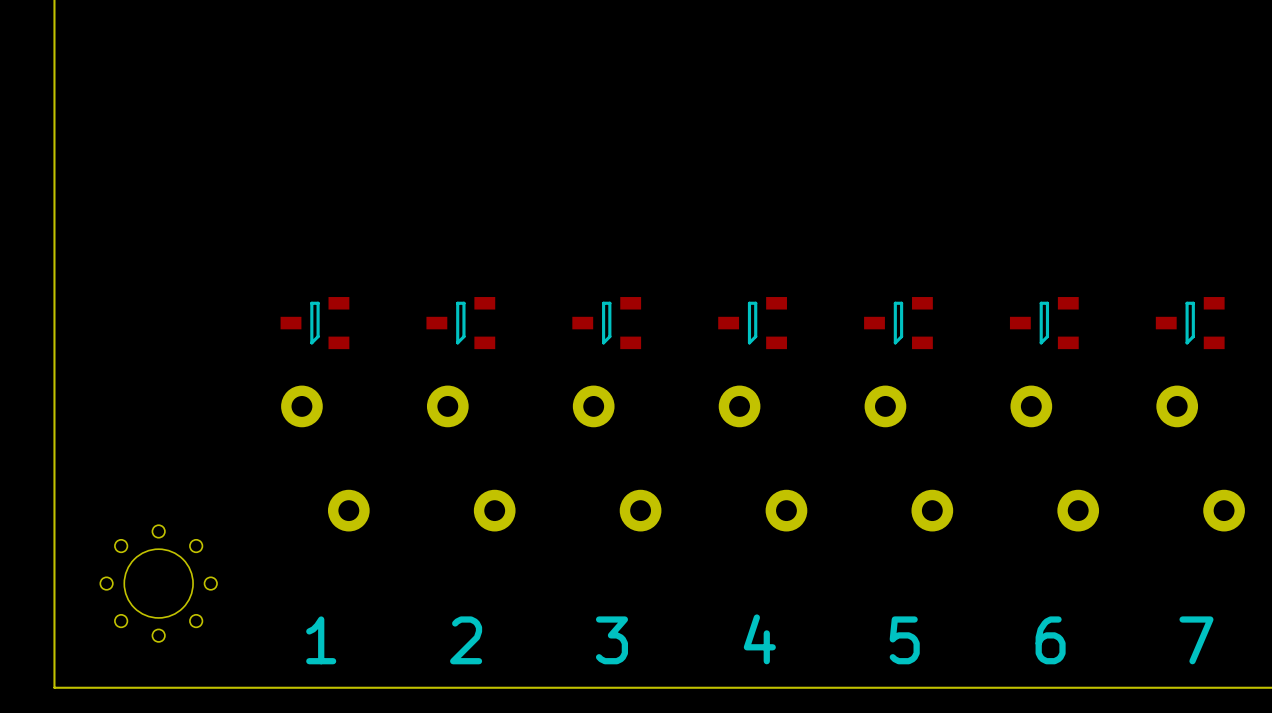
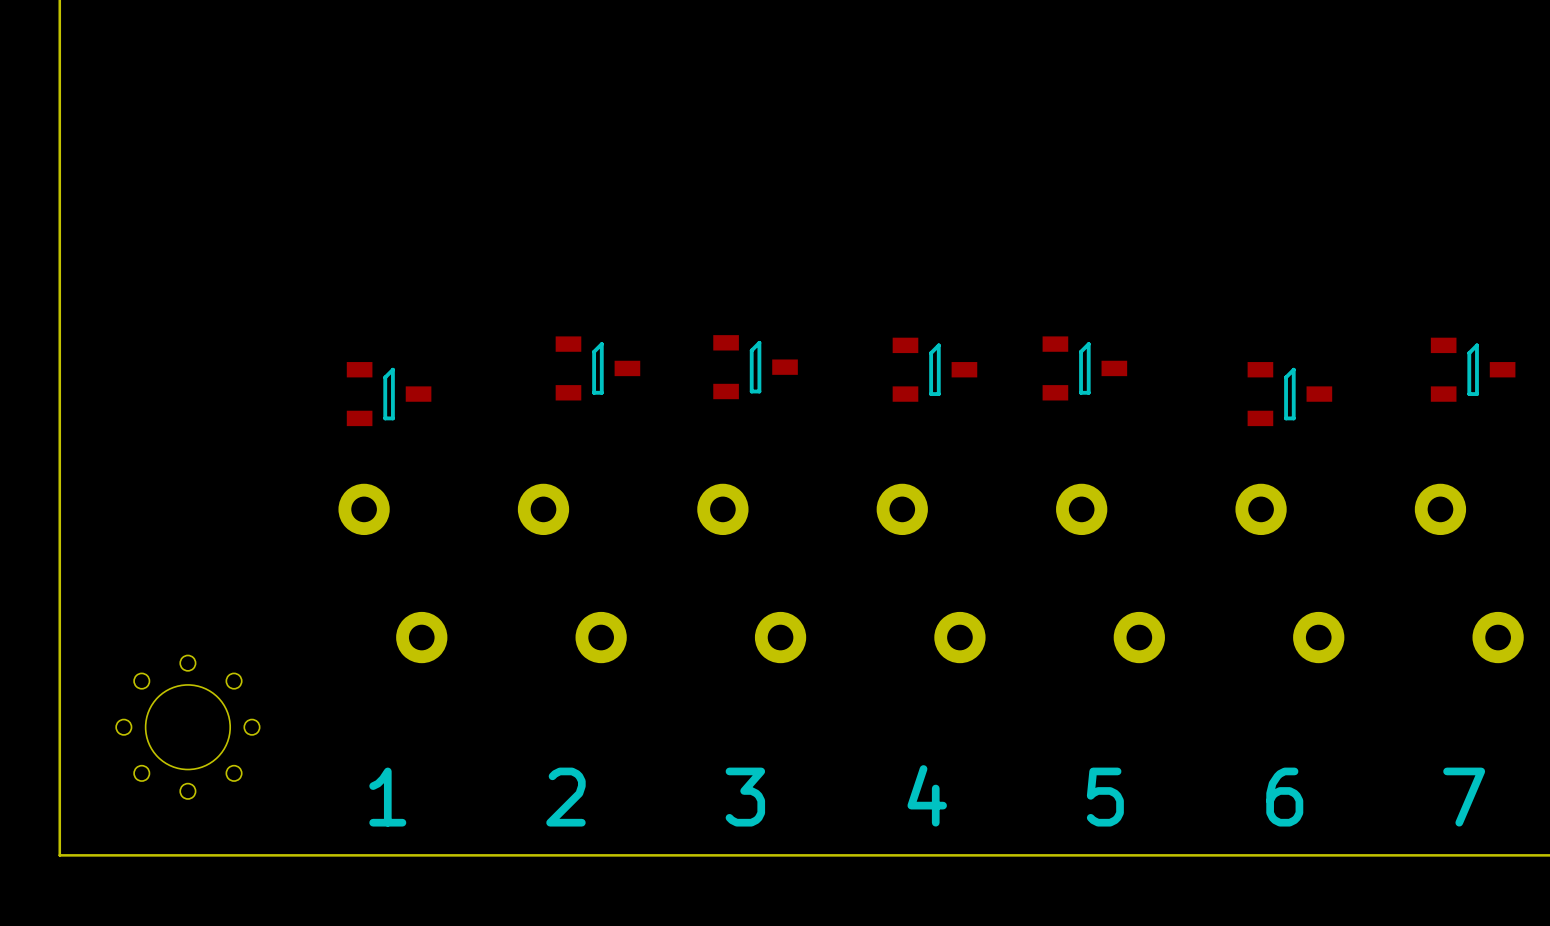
part rotation: 0° (314, 323) -> 180° (389, 394)
part rotation: 0° (460, 323) -> 180° (597, 368)
part position: (460, 323) -> (597, 368)
part rotation: 0° (606, 323) -> 180° (755, 367)
part rotation: 0° (752, 323) -> 180° (934, 369)
part rotation: 0° (898, 323) -> 180° (1084, 368)
part rotation: 0° (1044, 323) -> 180° (1289, 394)
part rotation: 0° (1190, 323) -> 180° (1473, 369)

